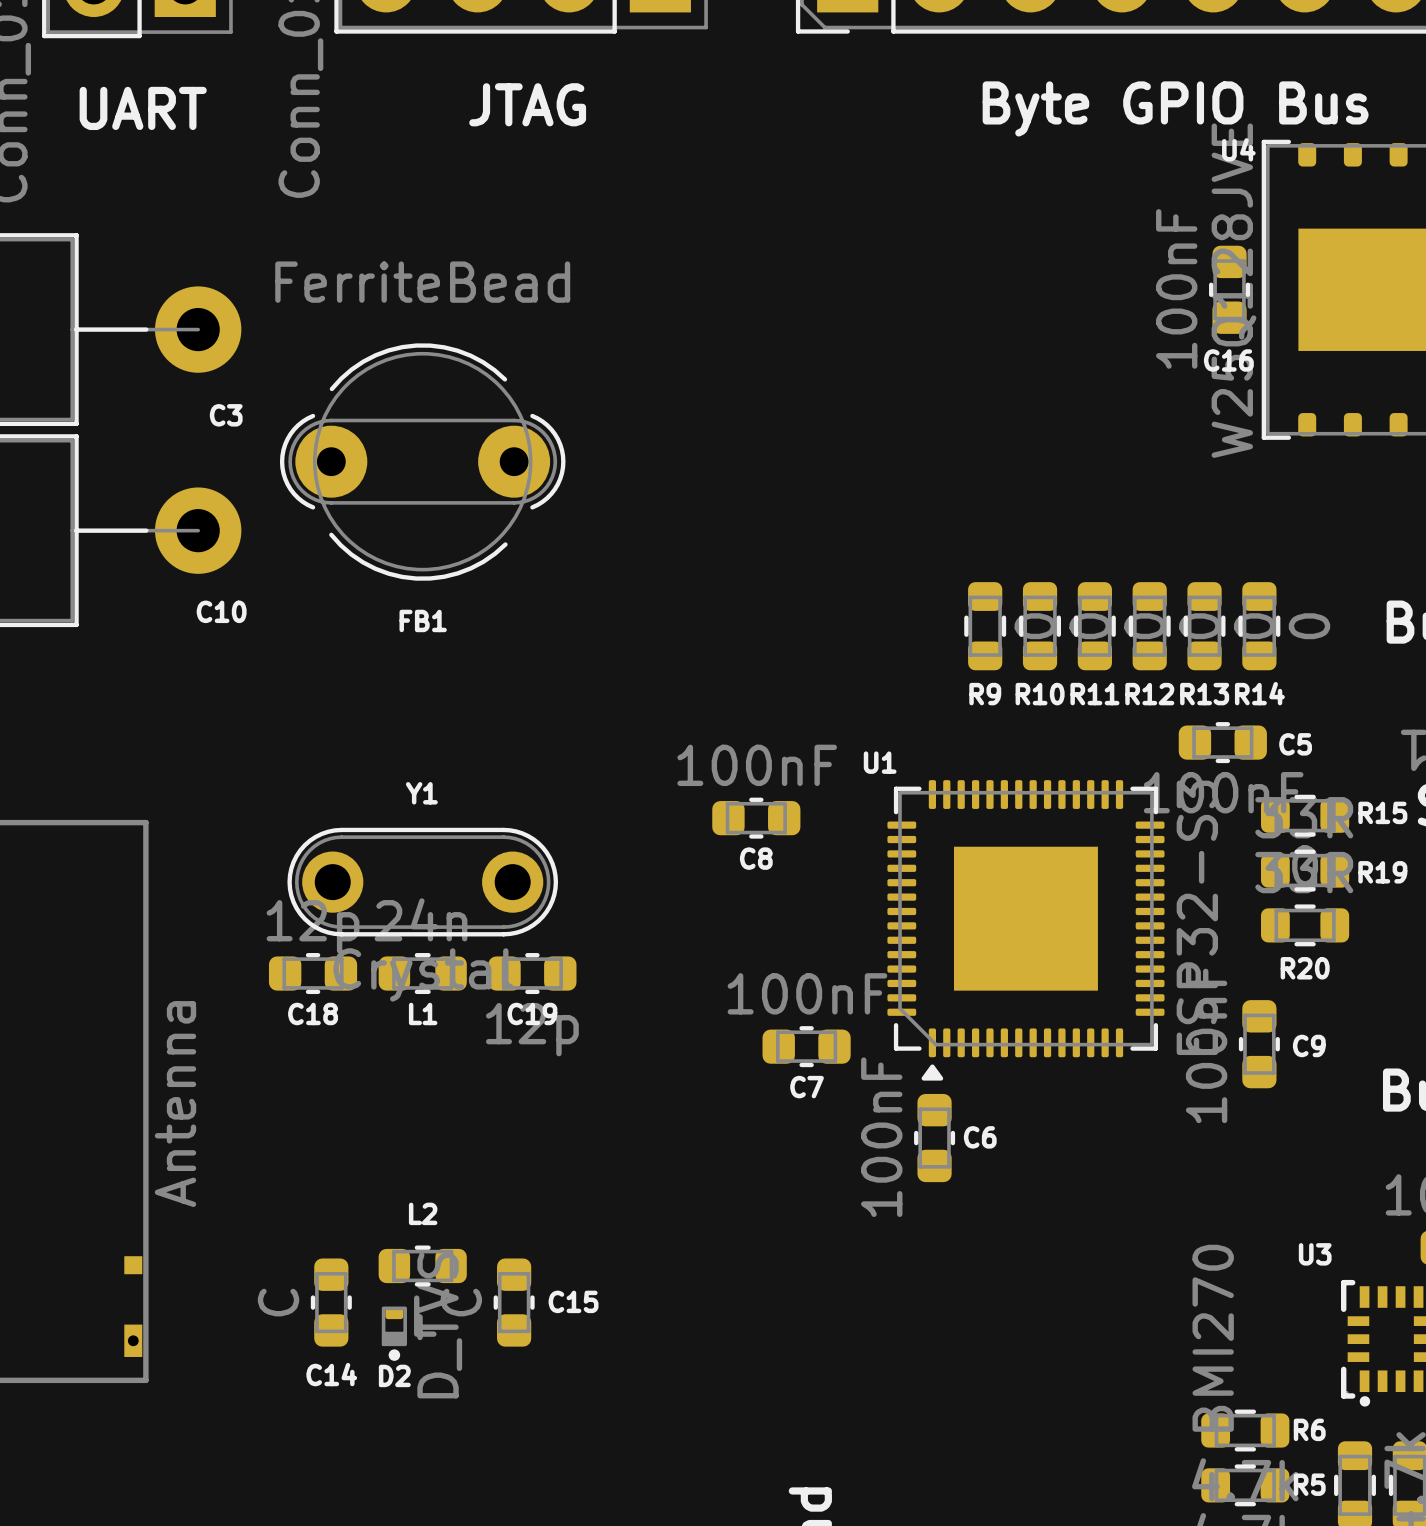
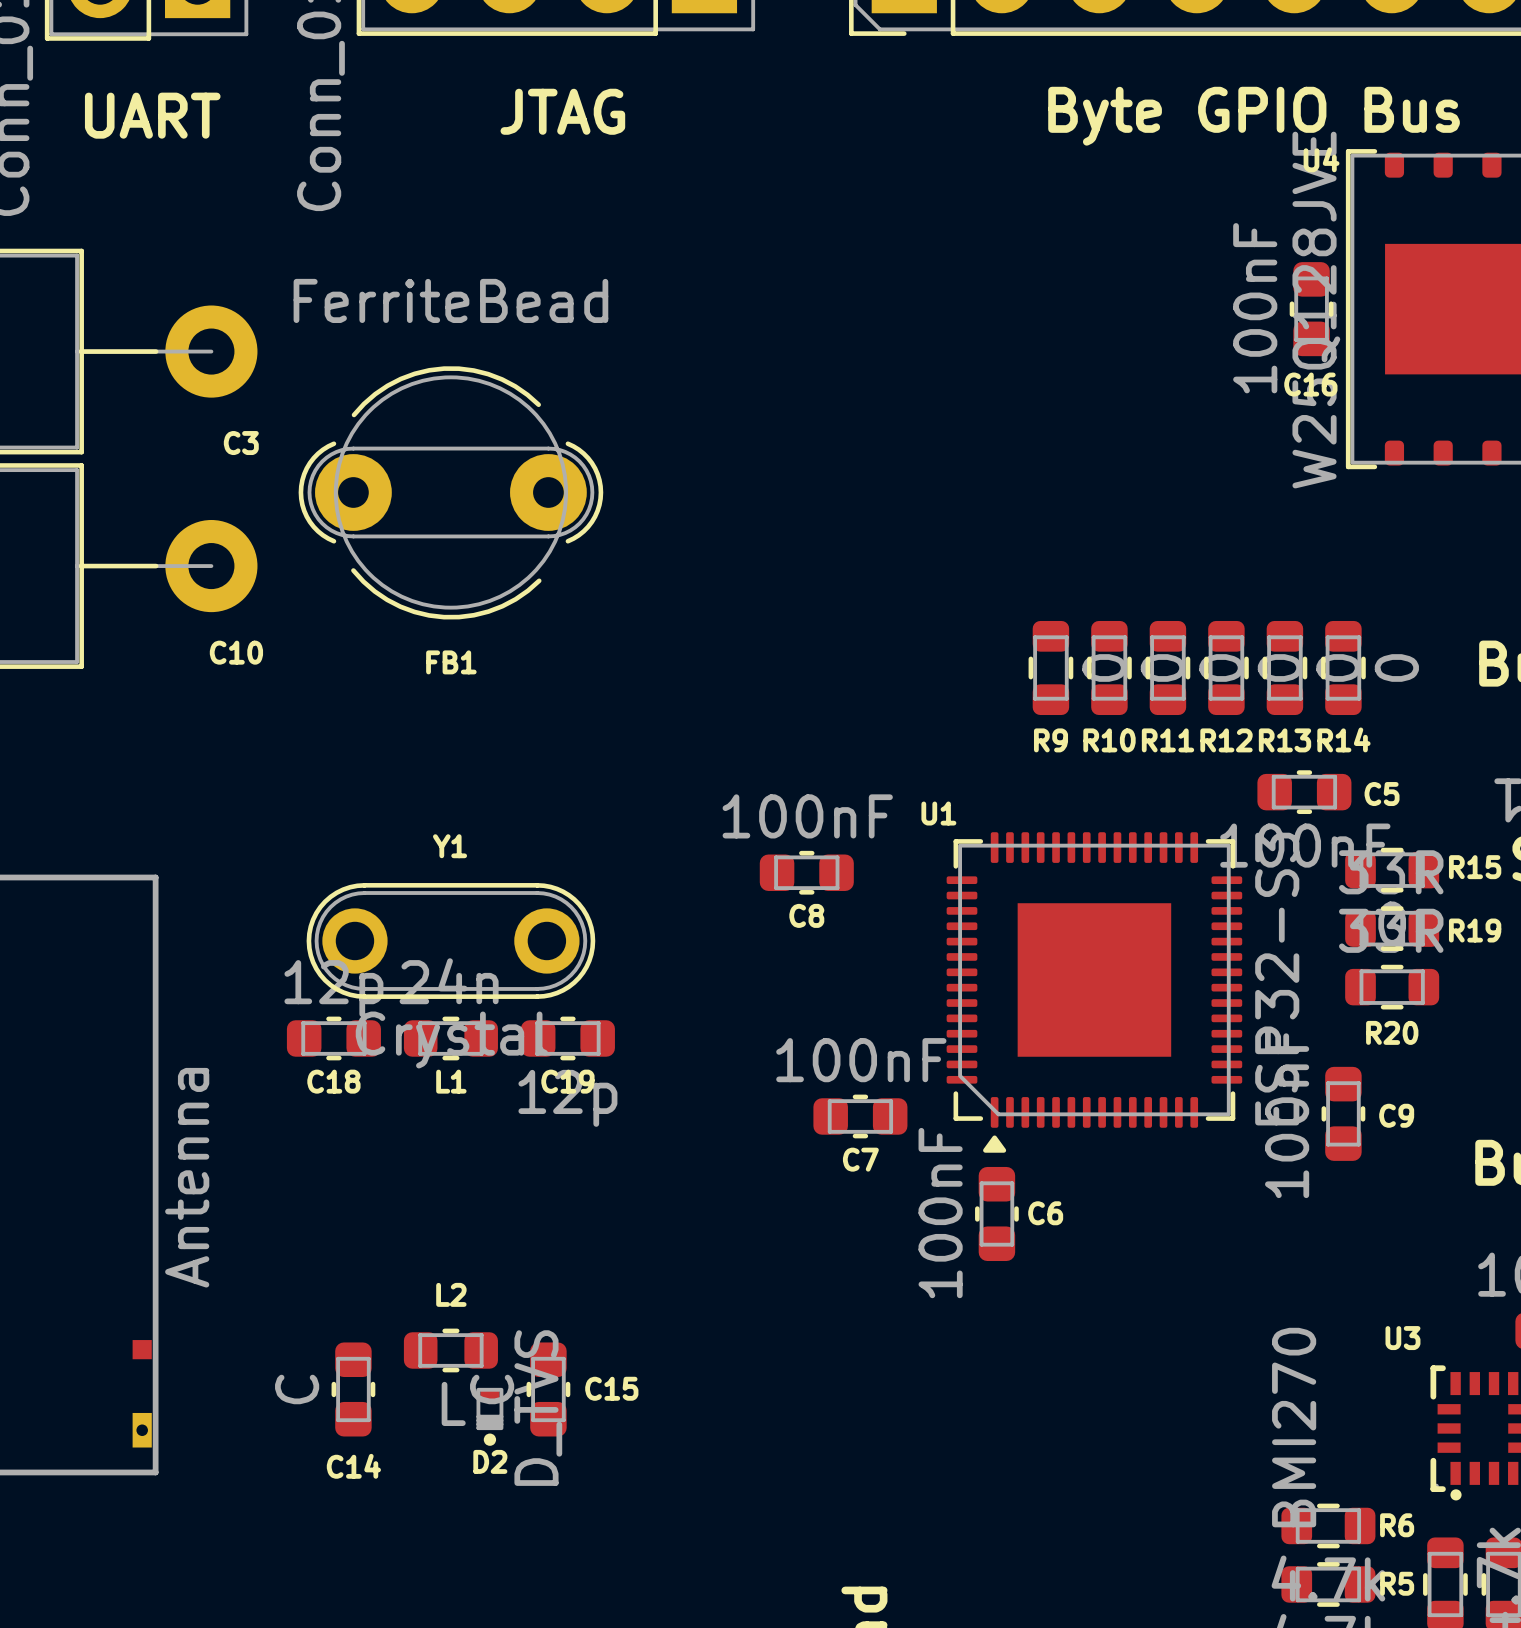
D2 position: (394, 1333) -> (489, 1416)

